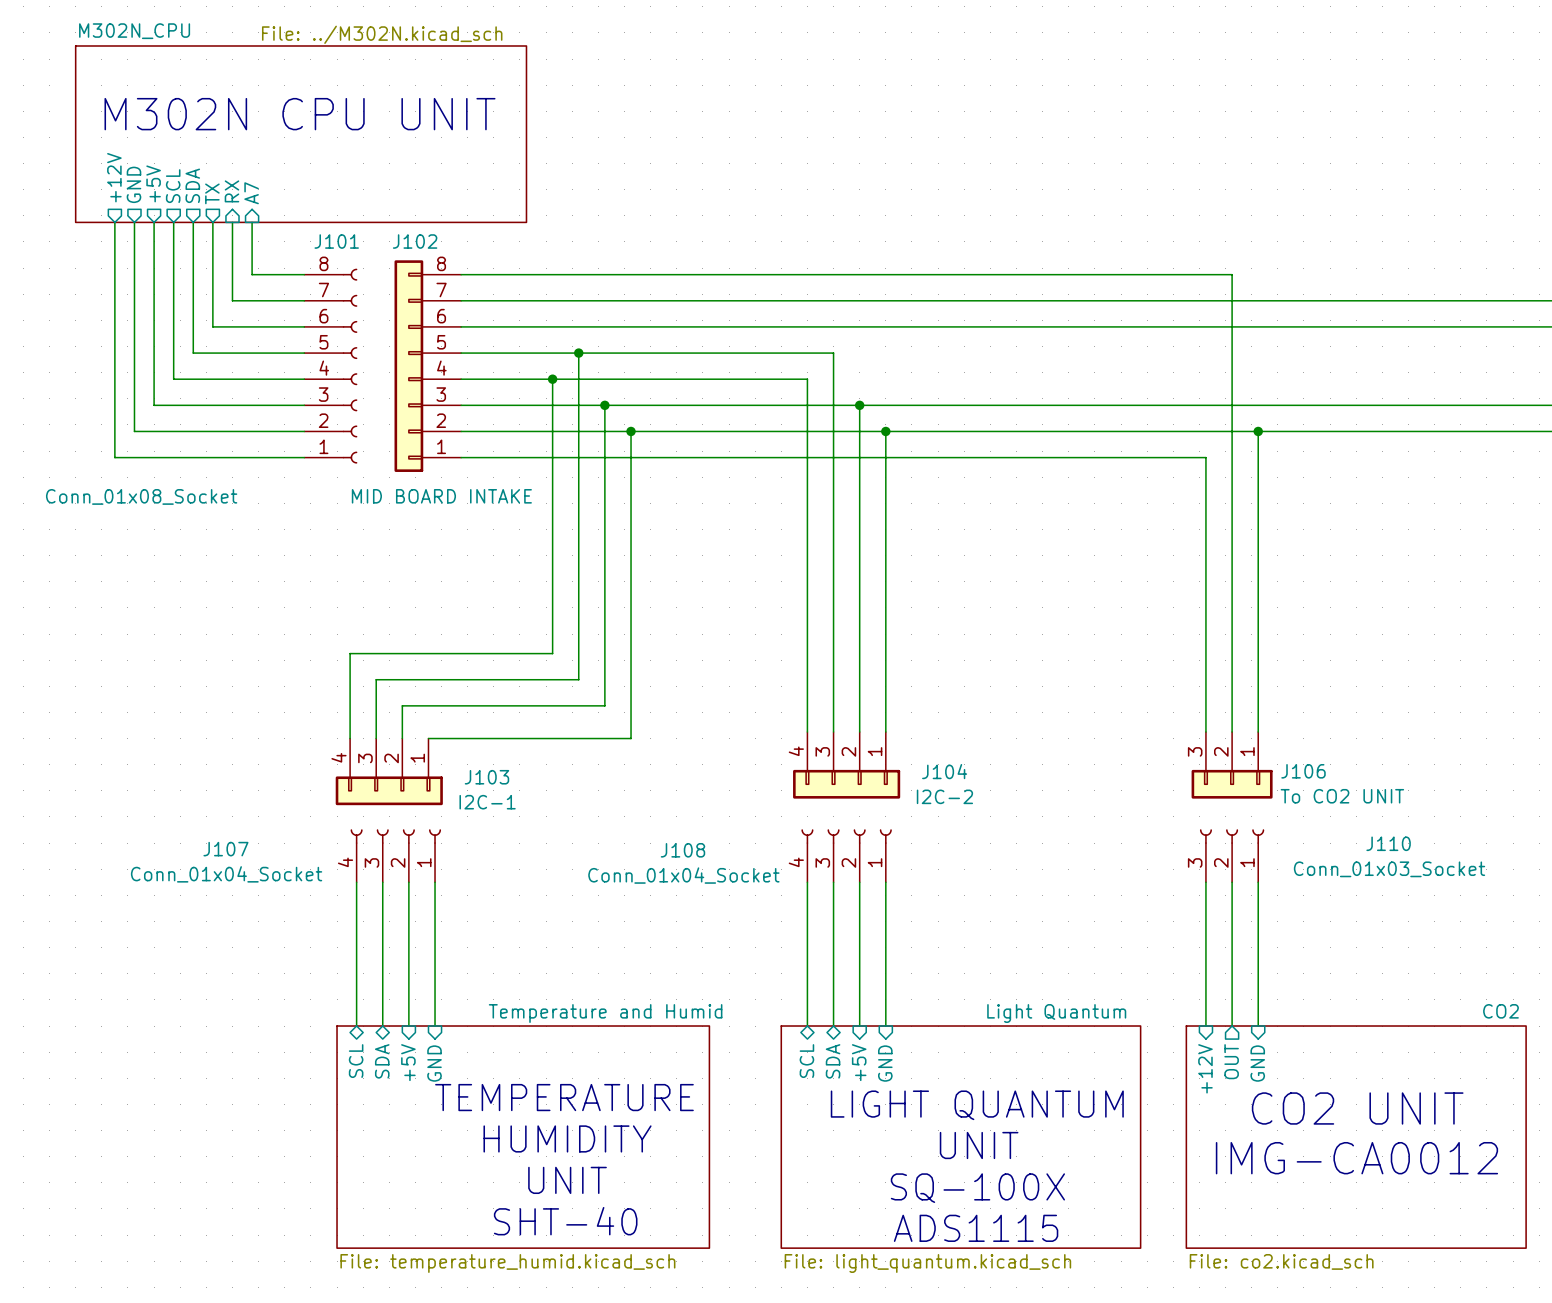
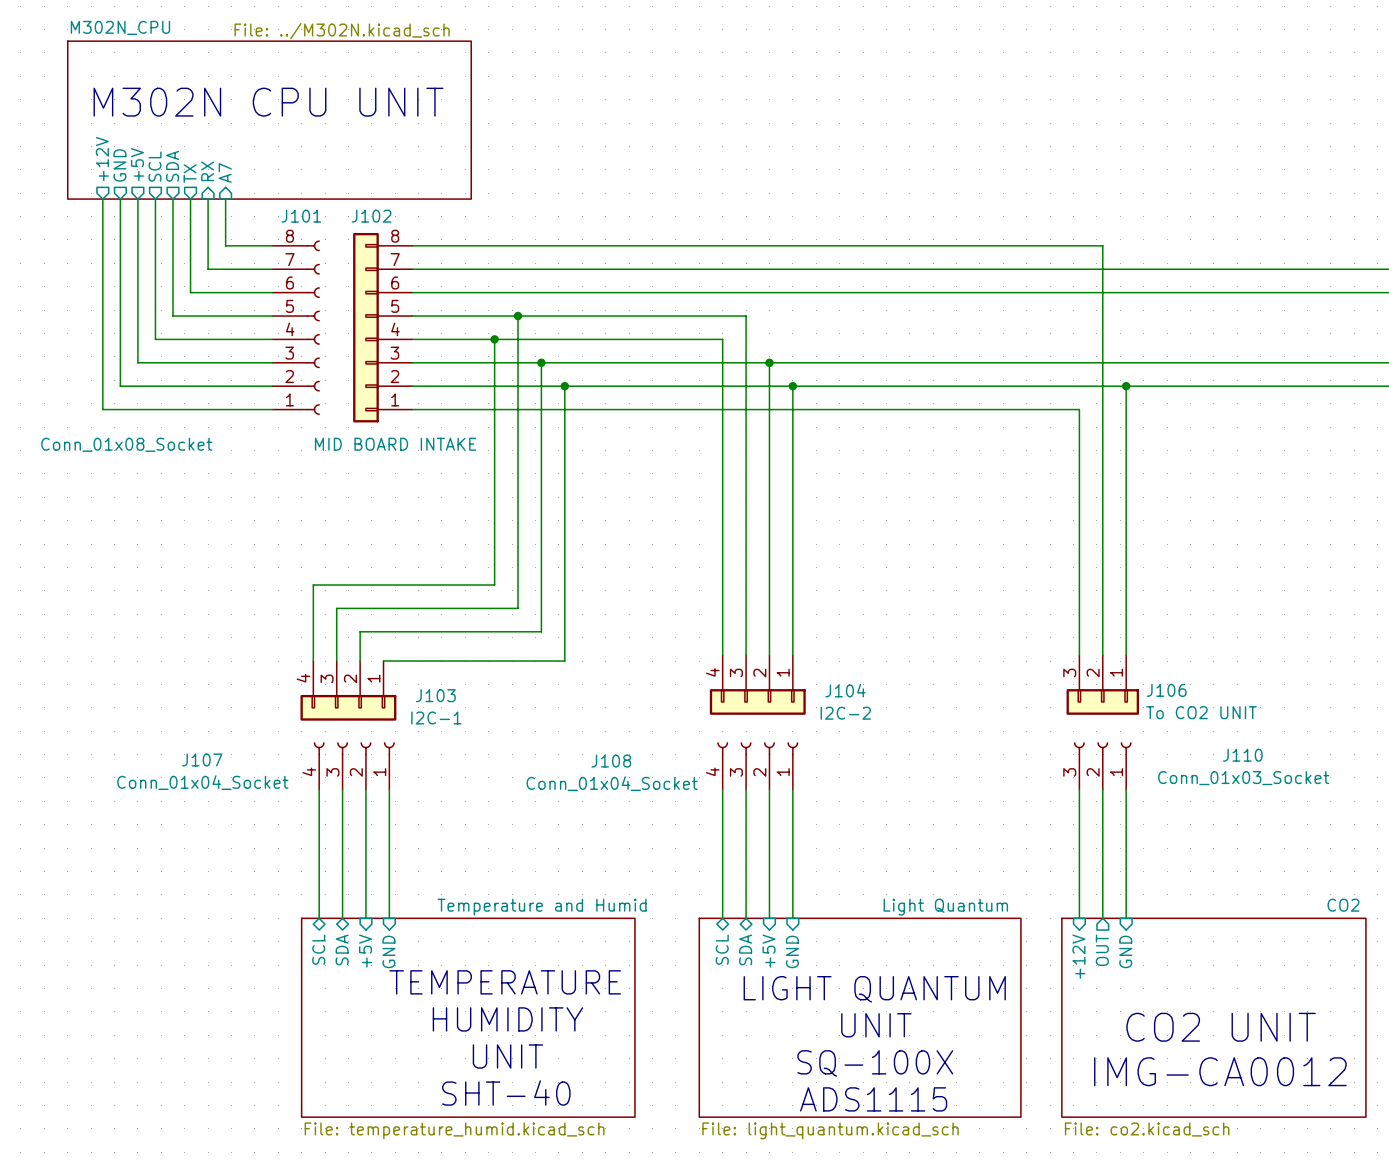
text position: CO2 UNIT (1357, 1108) -> CO2 UNIT (1221, 1027)
text position: IMG-CA0012 (1356, 1158) -> IMG-CA0012 (1220, 1071)

